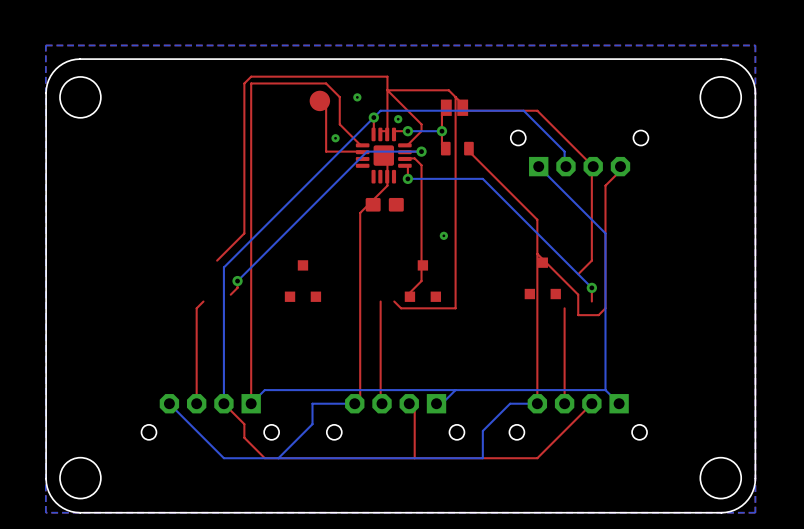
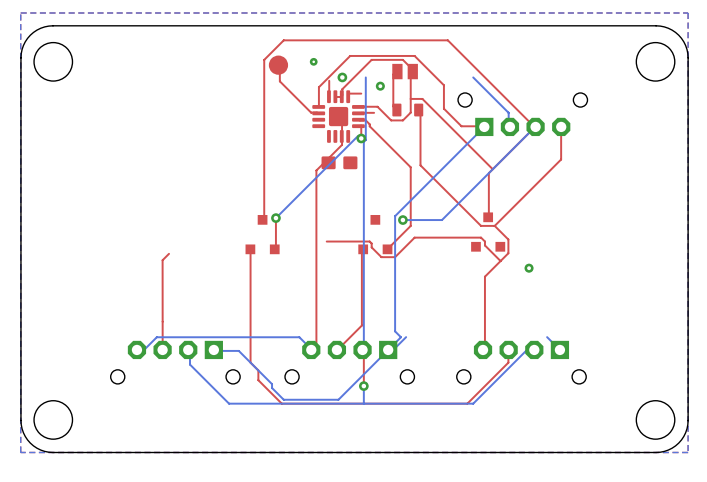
top track: (455, 97) (455, 308) (401, 308) (394, 301) -> none
top track: (319, 100) (326, 103) (326, 151) (362, 152) -> (278, 65) (279, 81) (311, 112) (318, 113)
via: none -> (342, 77)
bottom track: none -> (365, 77) (362, 349)
bottom track: (526, 113) (523, 110) (380, 110) (223, 267) (223, 403) -> (534, 349) (525, 350) (473, 403) (229, 403) (190, 364) (190, 350) (188, 349)
via: (373, 117) -> none
via: (398, 119) -> none
via: none -> (380, 86)
via: (407, 131) -> none
bottom track: (441, 131) (407, 131) -> none
via: (441, 131) -> none
top track: (380, 134) (380, 131) (387, 131) (387, 76) (251, 76) (244, 83) (244, 233) (217, 260) -> (335, 96) (341, 96) (342, 89) (371, 59) (402, 59) (412, 71)
top track: none -> (410, 98) (422, 98) (492, 169)
via: (335, 138) -> none
top track: (362, 145) (339, 124) (339, 97) (326, 83) (251, 83) (251, 403) -> (318, 106) (318, 87) (350, 55) (414, 55) (443, 85) (443, 108) (461, 126) (484, 126)
top track: (404, 145) (407, 144) (421, 131) (421, 124) (387, 90) (448, 90) (462, 103) (462, 110) (537, 110) (593, 166) (591, 260) (578, 274) -> (358, 106) (377, 106) (391, 120) (402, 120) (410, 112) (410, 73) (412, 71)
top track: (468, 148) (469, 151) (537, 219) (537, 403) -> (418, 110) (420, 110) (420, 165) (481, 225) (494, 225)
bottom track: (421, 151) (367, 151) (237, 281) -> none
via: (421, 151) -> none
top track: (404, 158) (414, 158) (421, 165) (421, 281) (407, 294) -> (358, 119) (365, 120) (410, 167) (410, 225) (387, 249)
bottom track: (538, 166) (605, 233) (605, 390) (264, 390) (251, 403) -> (484, 126) (395, 216) (395, 331) (400, 337) (338, 399) (283, 399) (272, 388) (272, 384) (238, 350) (213, 349)
bottom track: none -> (535, 126) (441, 220) (402, 220)
top track: (620, 166) (619, 172) (605, 185) (605, 308) (598, 315) (578, 315) (578, 294) (537, 253) -> (561, 126) (561, 159) (494, 225)
bottom track: none -> (357, 136) (275, 218)
bottom track: (407, 178) (482, 178) (591, 287) -> none
via: (443, 235) -> none
top track: none -> (488, 217) (488, 173) (535, 126) (447, 40) (283, 40) (264, 59) (264, 218) (262, 219)
top track: none -> (275, 218) (274, 249)
via: none -> (275, 218)
via: none -> (402, 220)
top track: none -> (494, 225) (508, 239) (508, 253) (484, 276) (484, 348) (483, 349)
top track: (237, 281) (237, 287) (230, 294) -> none
via: (237, 281) -> none
top track: (591, 287) (591, 301) -> none
via: (591, 287) -> none
top track: none -> (326, 241) (369, 241) (371, 247) (381, 257) (395, 257) (414, 237) (481, 237) (484, 241) (484, 245) (500, 261)
top track: (380, 301) (382, 403) -> (363, 249) (361, 325) (336, 349)
top track: (564, 308) (564, 403) -> (250, 249) (250, 362) (258, 370) (258, 380) (281, 403) (467, 403) (508, 362) (508, 349)
via: none -> (529, 268)
bottom track: (354, 403) (312, 403) (312, 424) (278, 458) -> (311, 349) (299, 337) (156, 337) (145, 348) (136, 349)
top track: (409, 403) (414, 403) (414, 458) -> (362, 349) (363, 386)
bottom track: (537, 403) (510, 403) (482, 430) (482, 458) (223, 458) (169, 403) -> none
top track: (591, 403) (537, 458) (264, 458) (244, 437) (244, 424) (223, 403) -> none
bottom track: none -> (363, 386) (363, 403)
via: none -> (363, 386)

